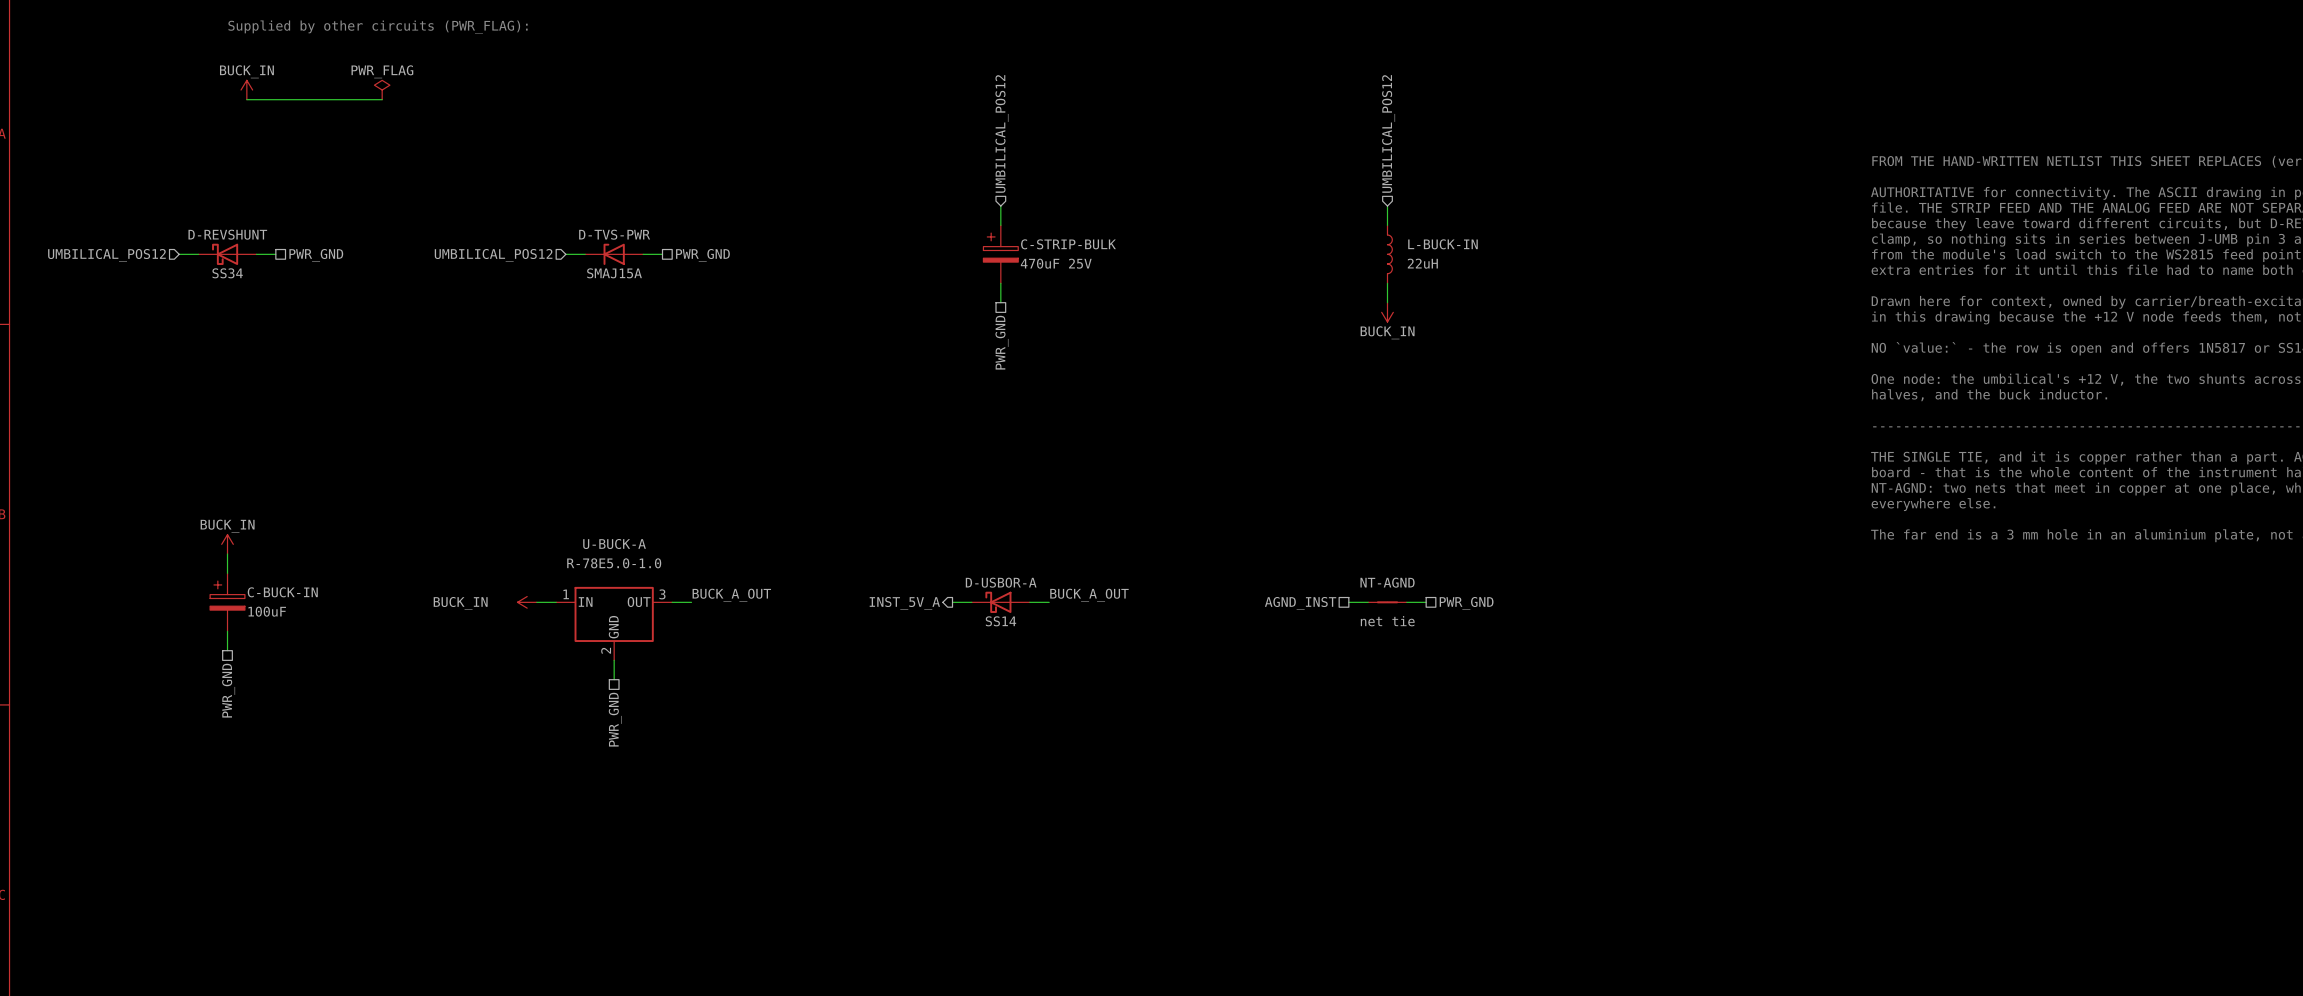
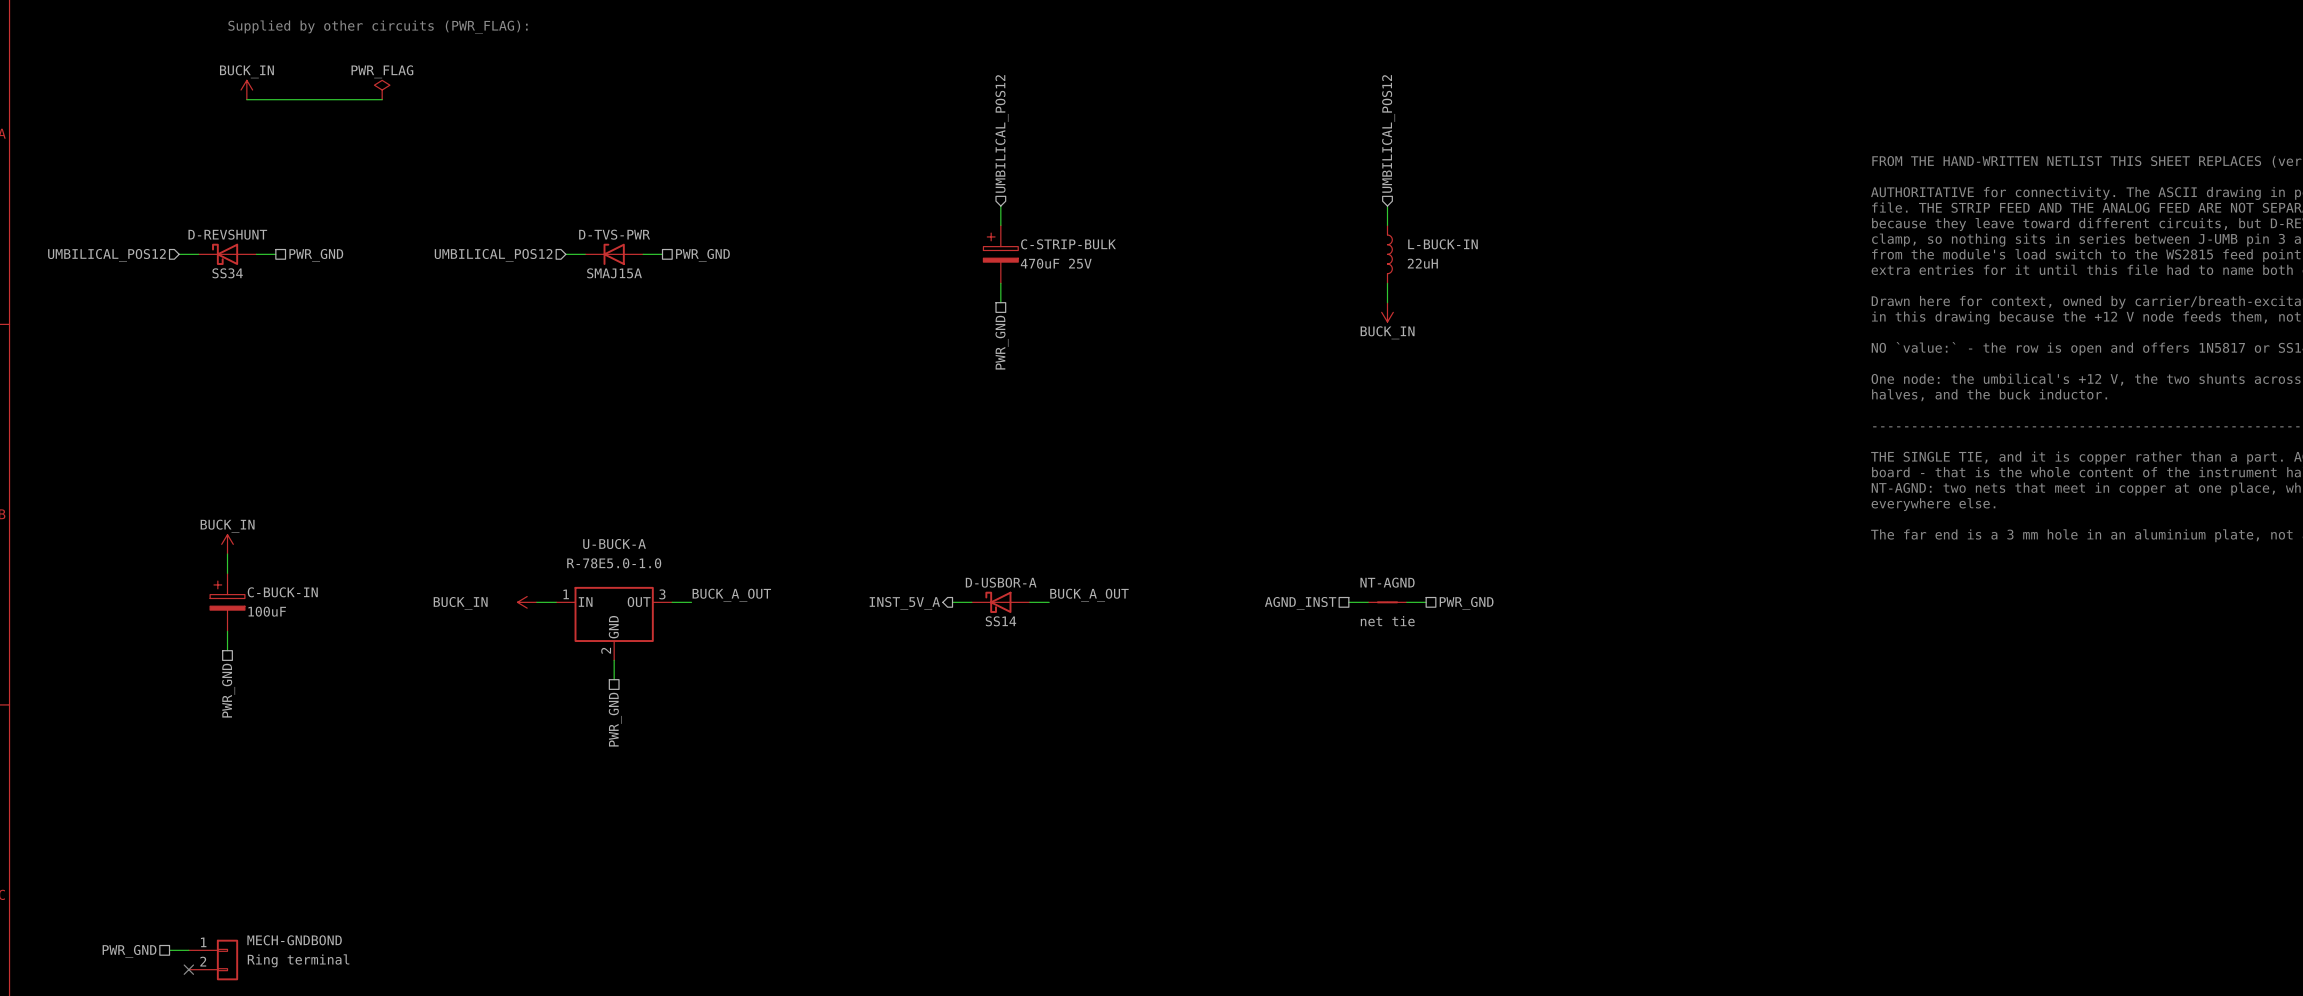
wire: none -> (169, 950) (188, 950)
hierarchical label: none -> PWR_GND (129, 951)
MECH-GNDBOND: none -> Ring terminal (213, 960)
no-connect mark: none -> (188, 969)

